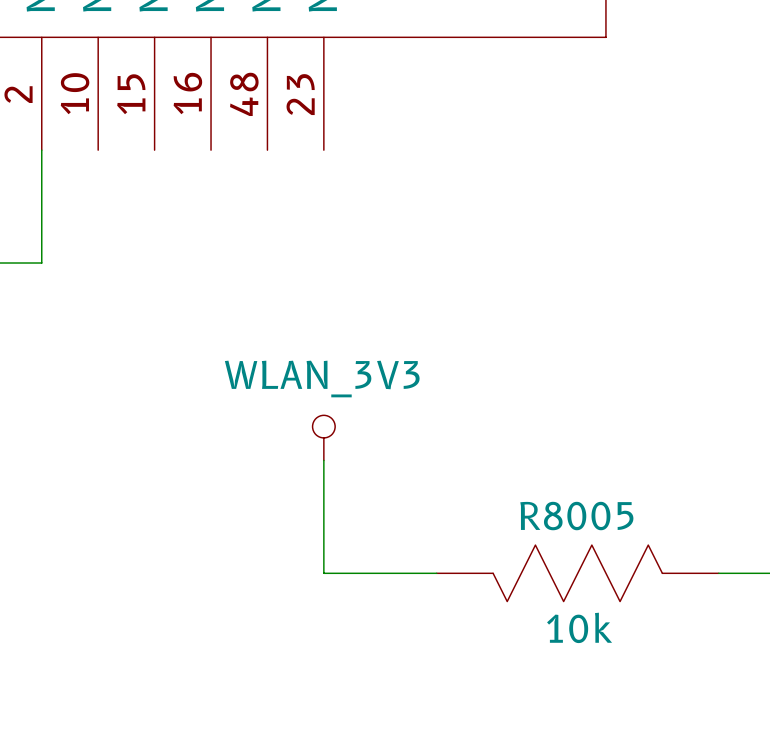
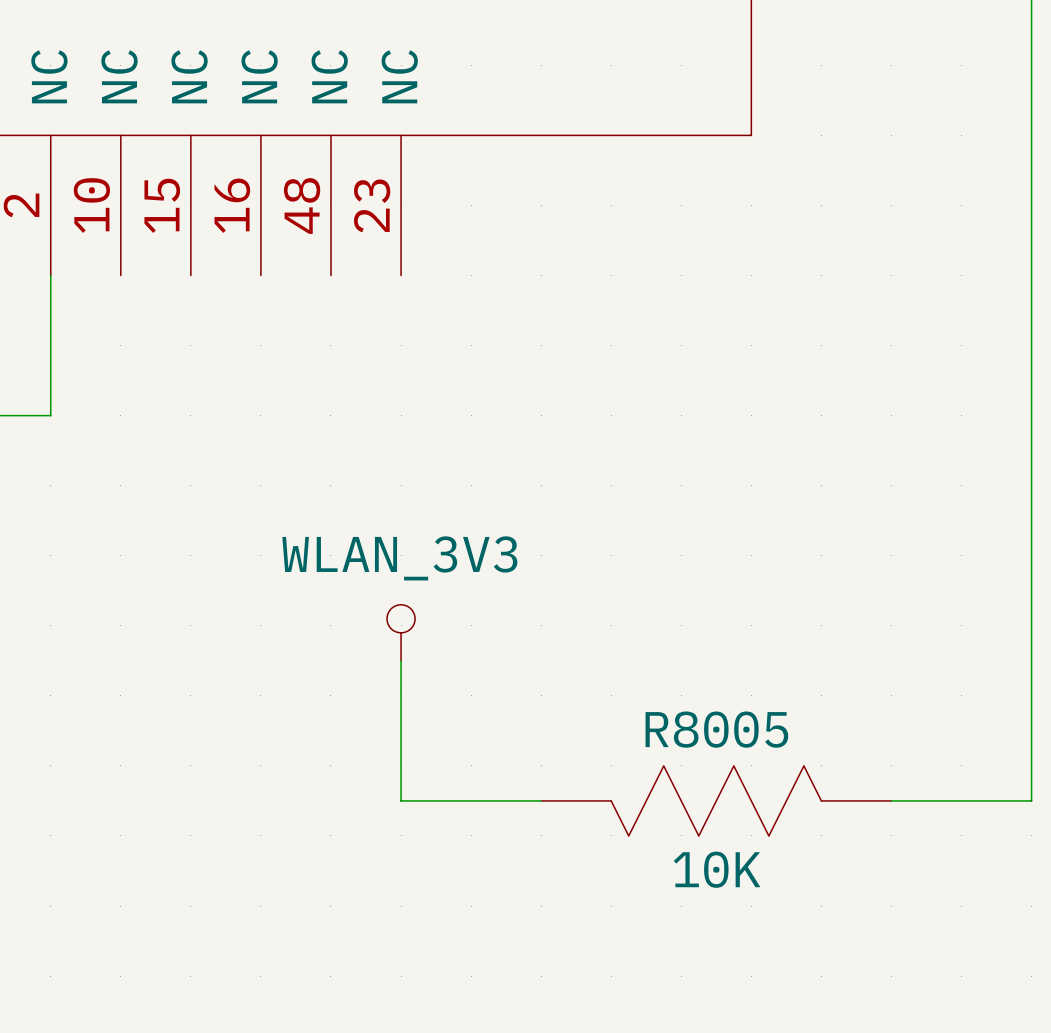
R8005 value: 10k (579, 627) -> 10K (717, 869)

